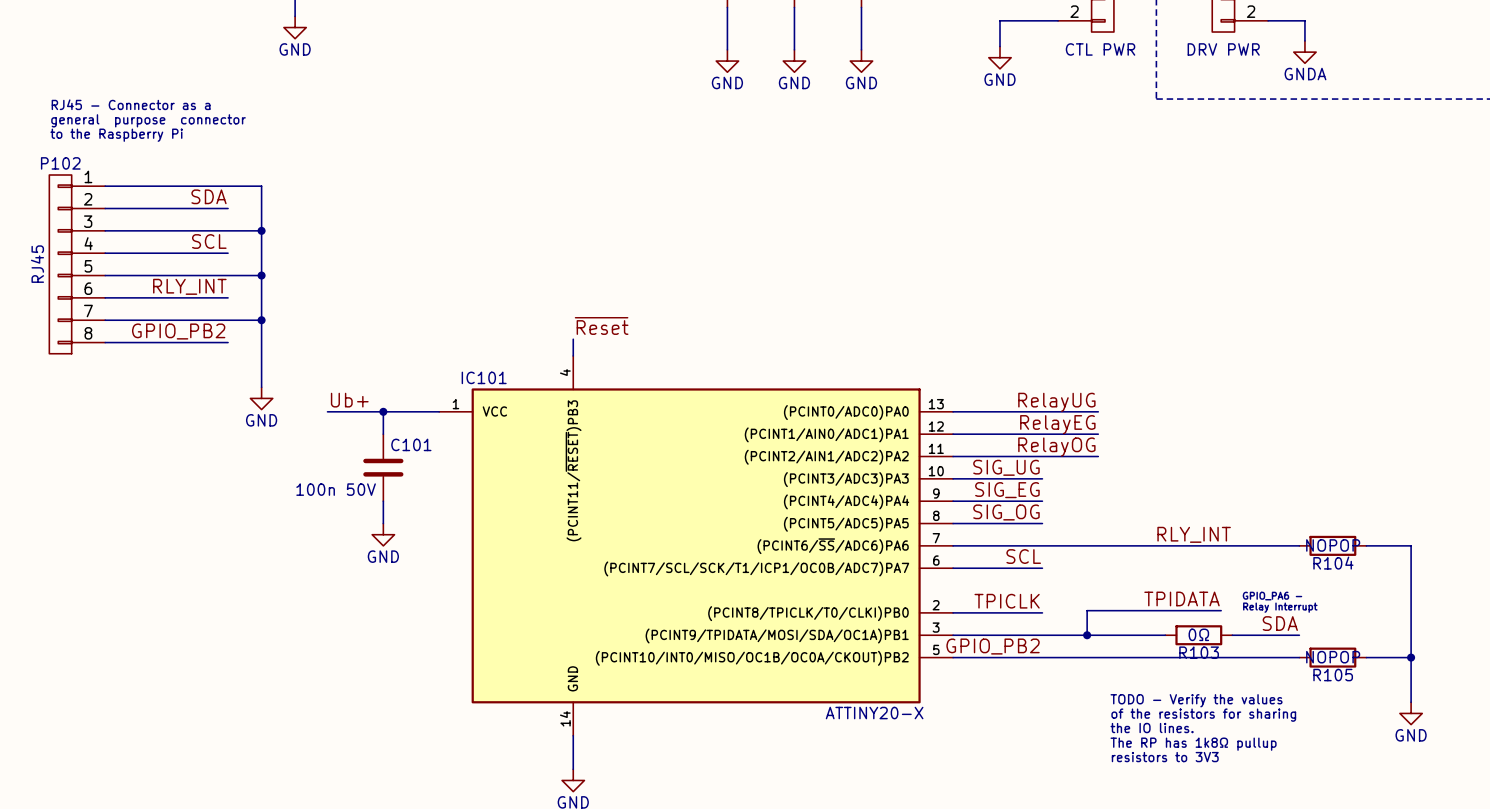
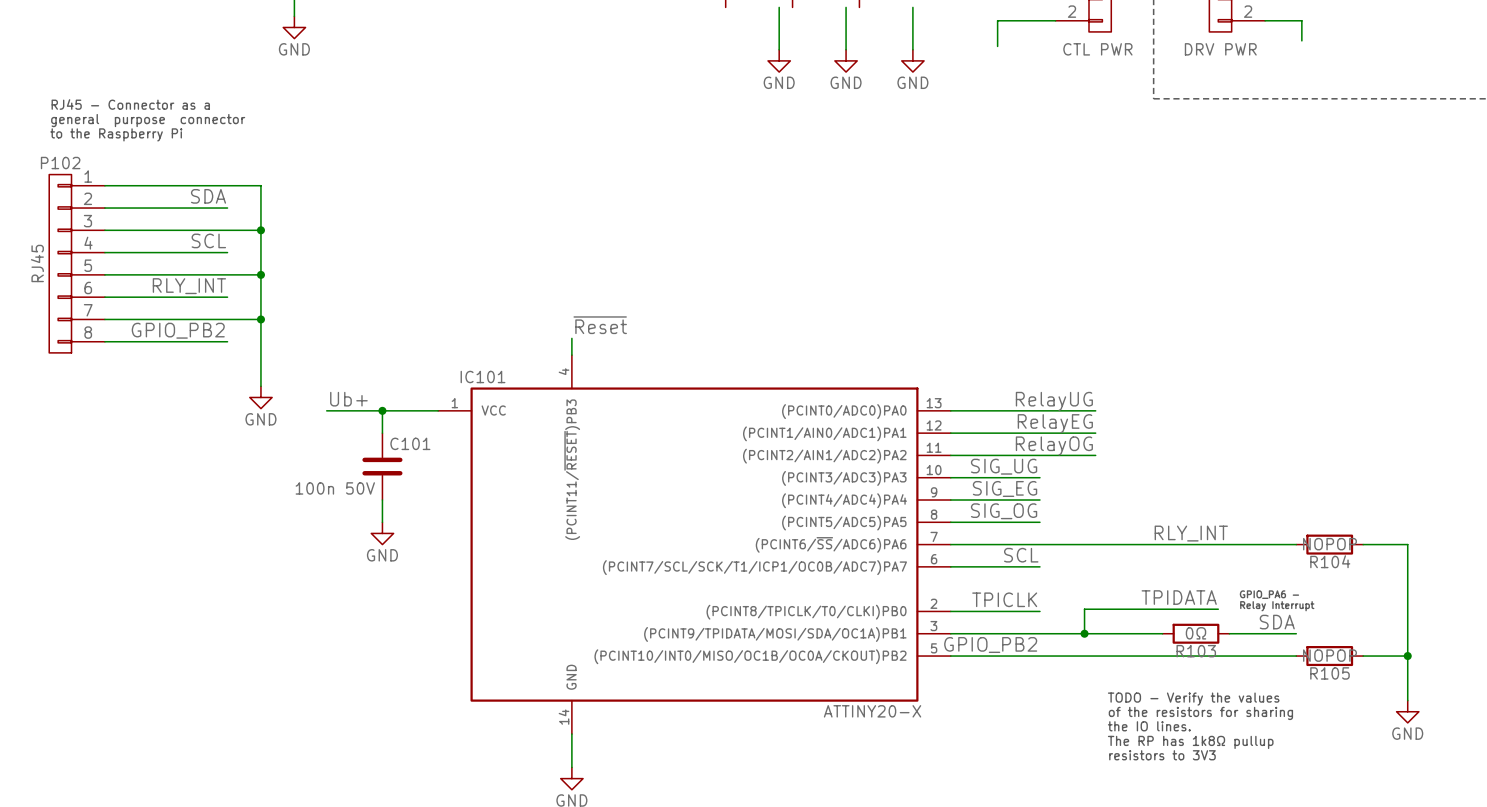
wire: (727, 7) (727, 49) -> (779, 7) (779, 49)
wire: (794, 7) (794, 49) -> (846, 7) (846, 49)
wire: (861, 7) (861, 49) -> (912, 7) (912, 49)
power symbol: GNDA (1304, 52) -> none
power symbol: GND (999, 57) -> none
power symbol: GND (727, 61) -> none
power symbol position: GND (794, 61) -> GND (779, 60)
power symbol position: GND (861, 61) -> GND (846, 60)
power symbol: none -> GND (912, 60)

